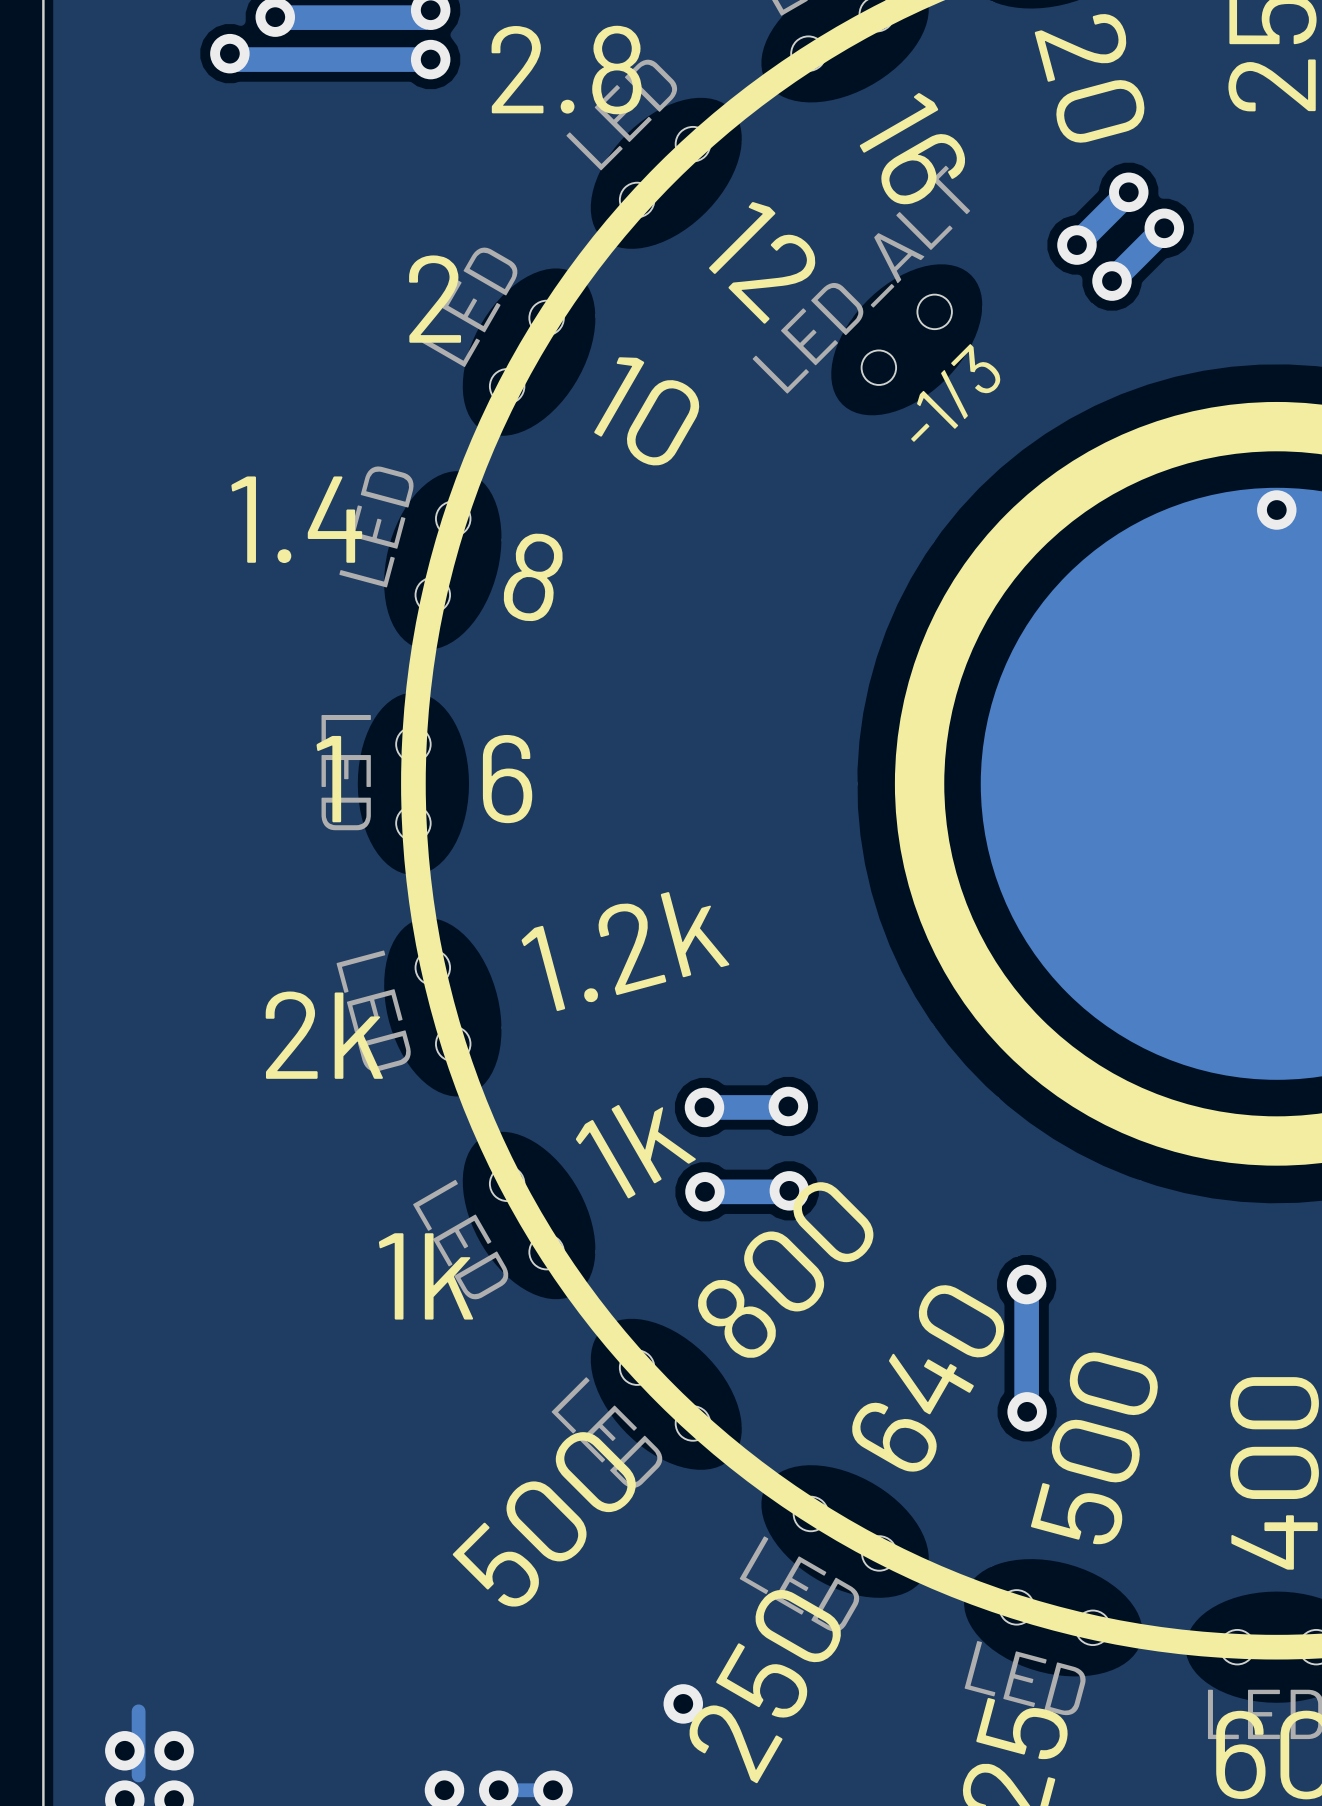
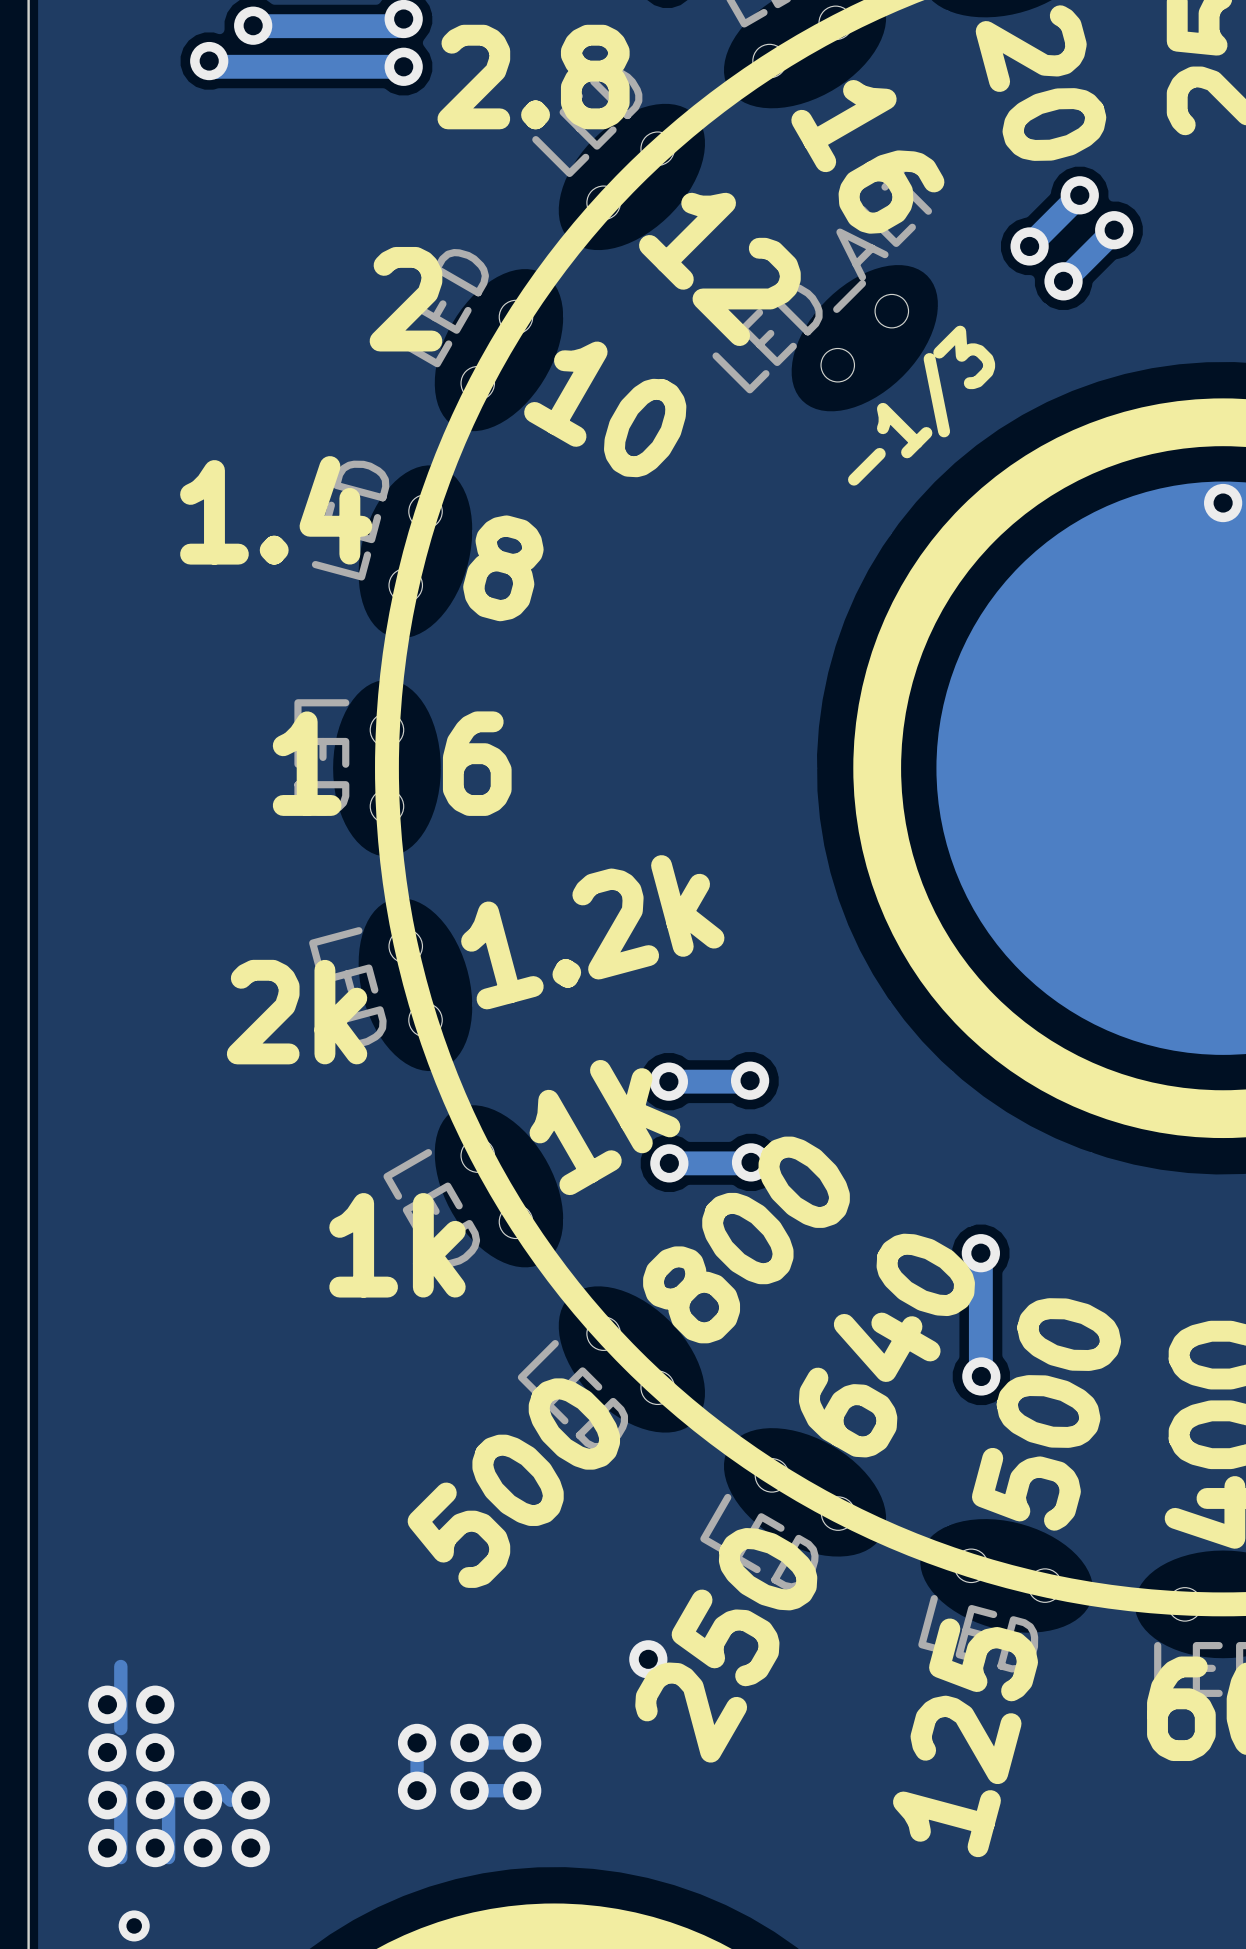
text position: -1/3 (955, 392) -> -1/3 (921, 405)

